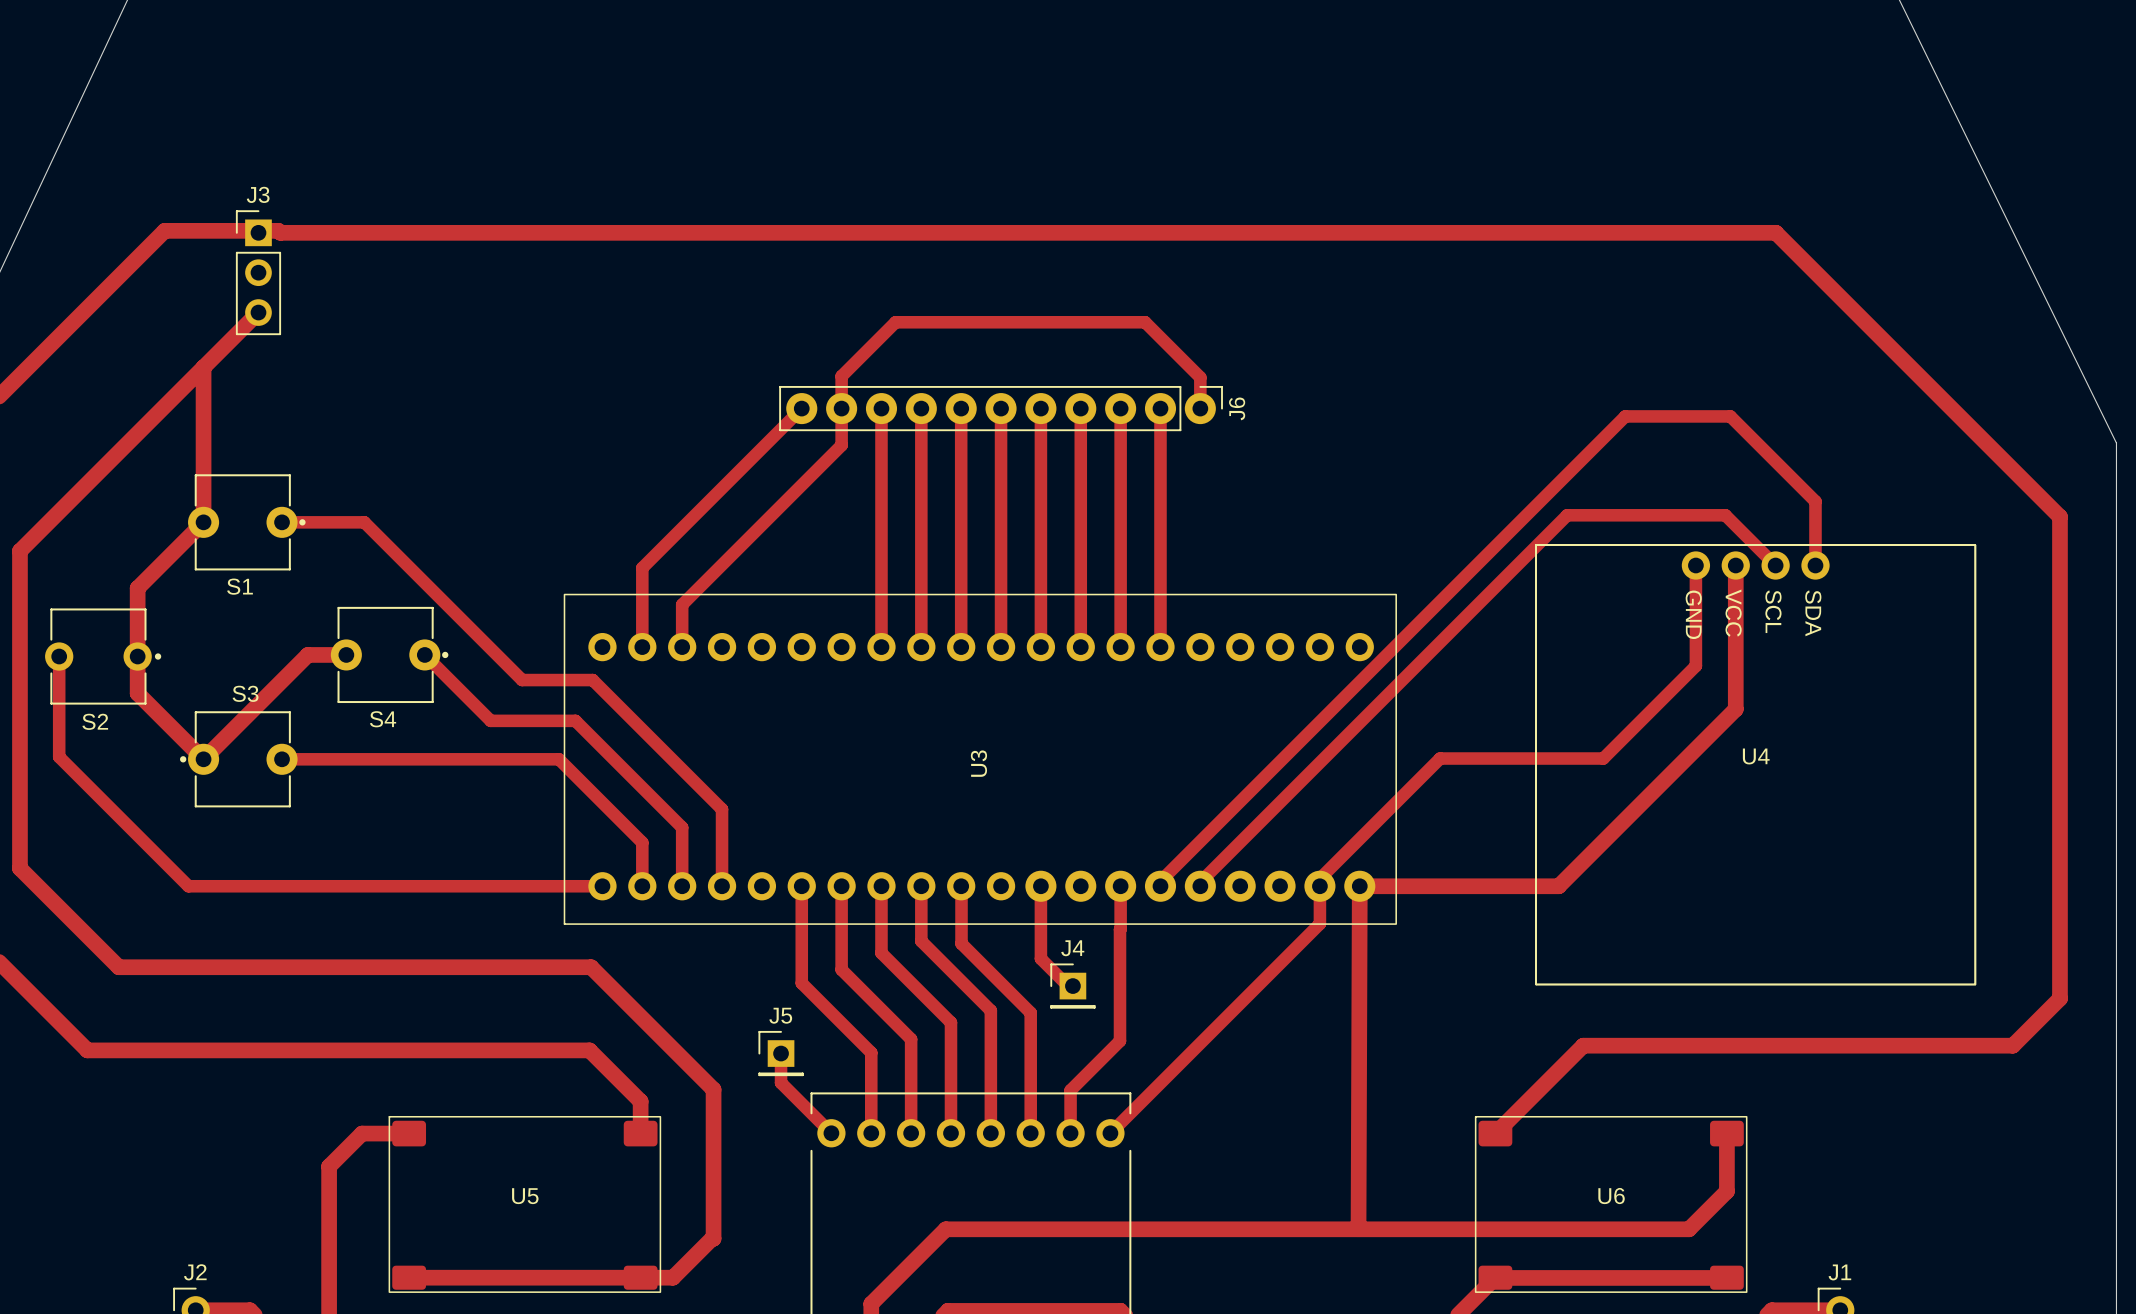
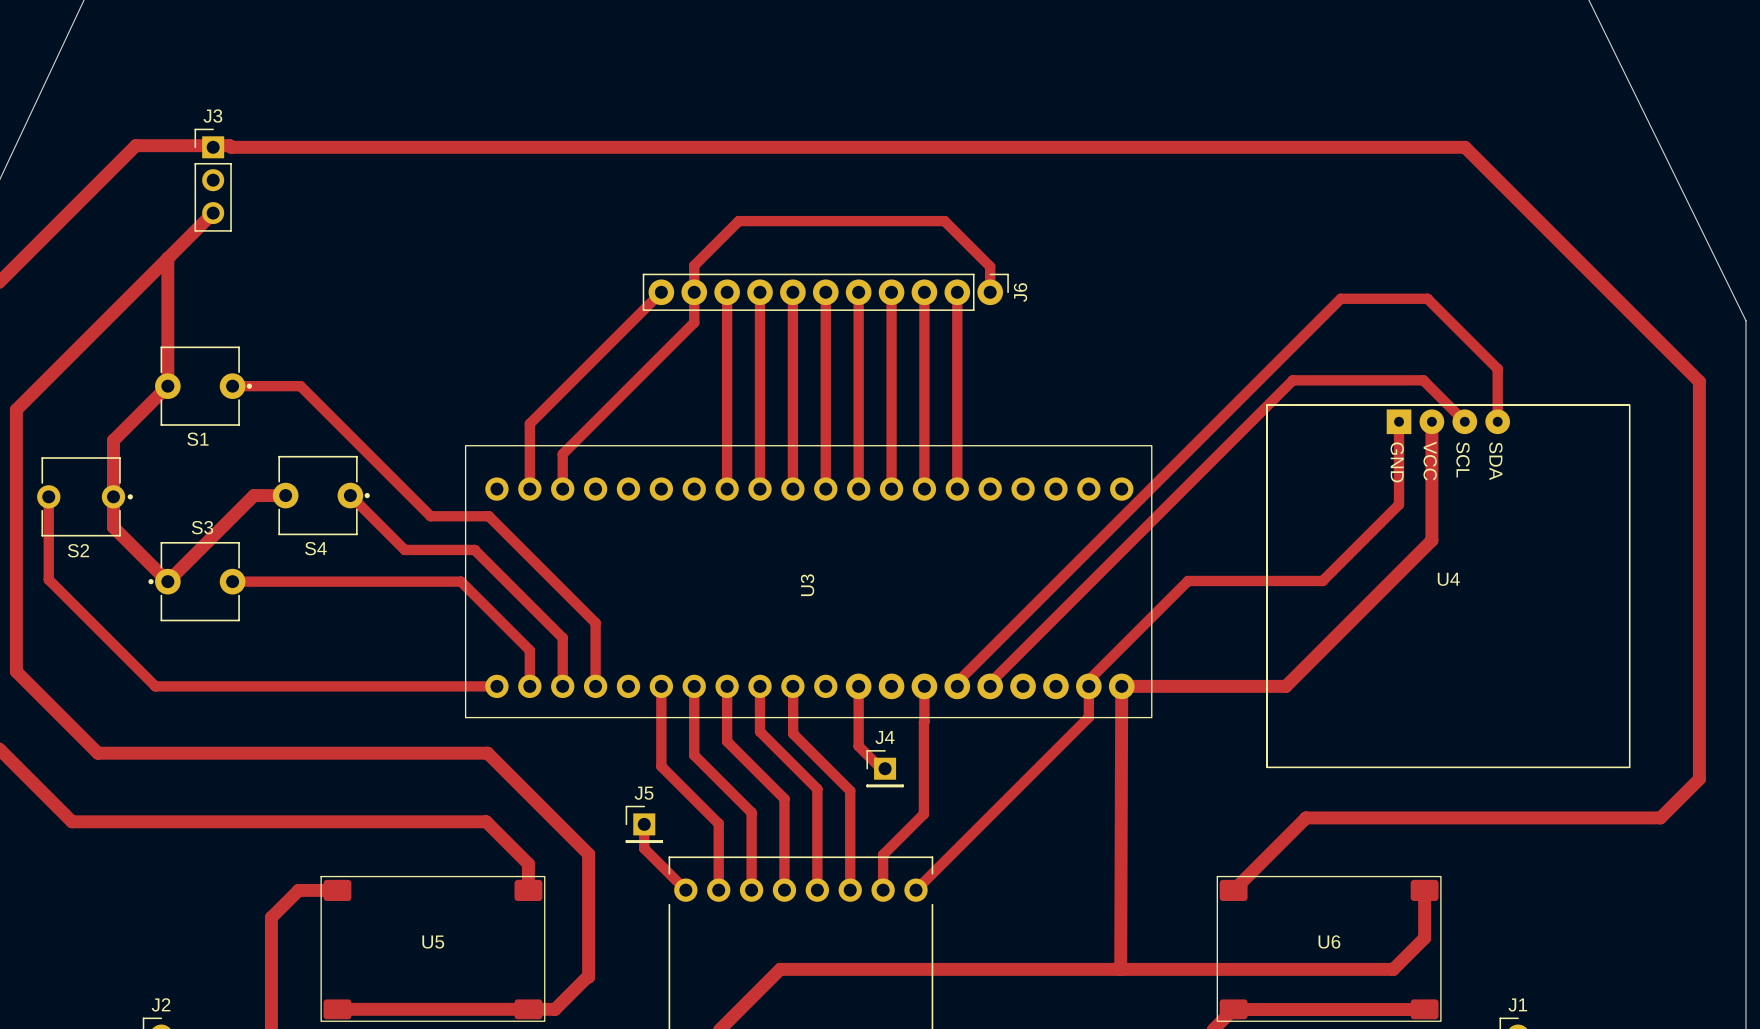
U4 footprint: [1535, 544, 1977, 986] -> [1266, 404, 1631, 769]

